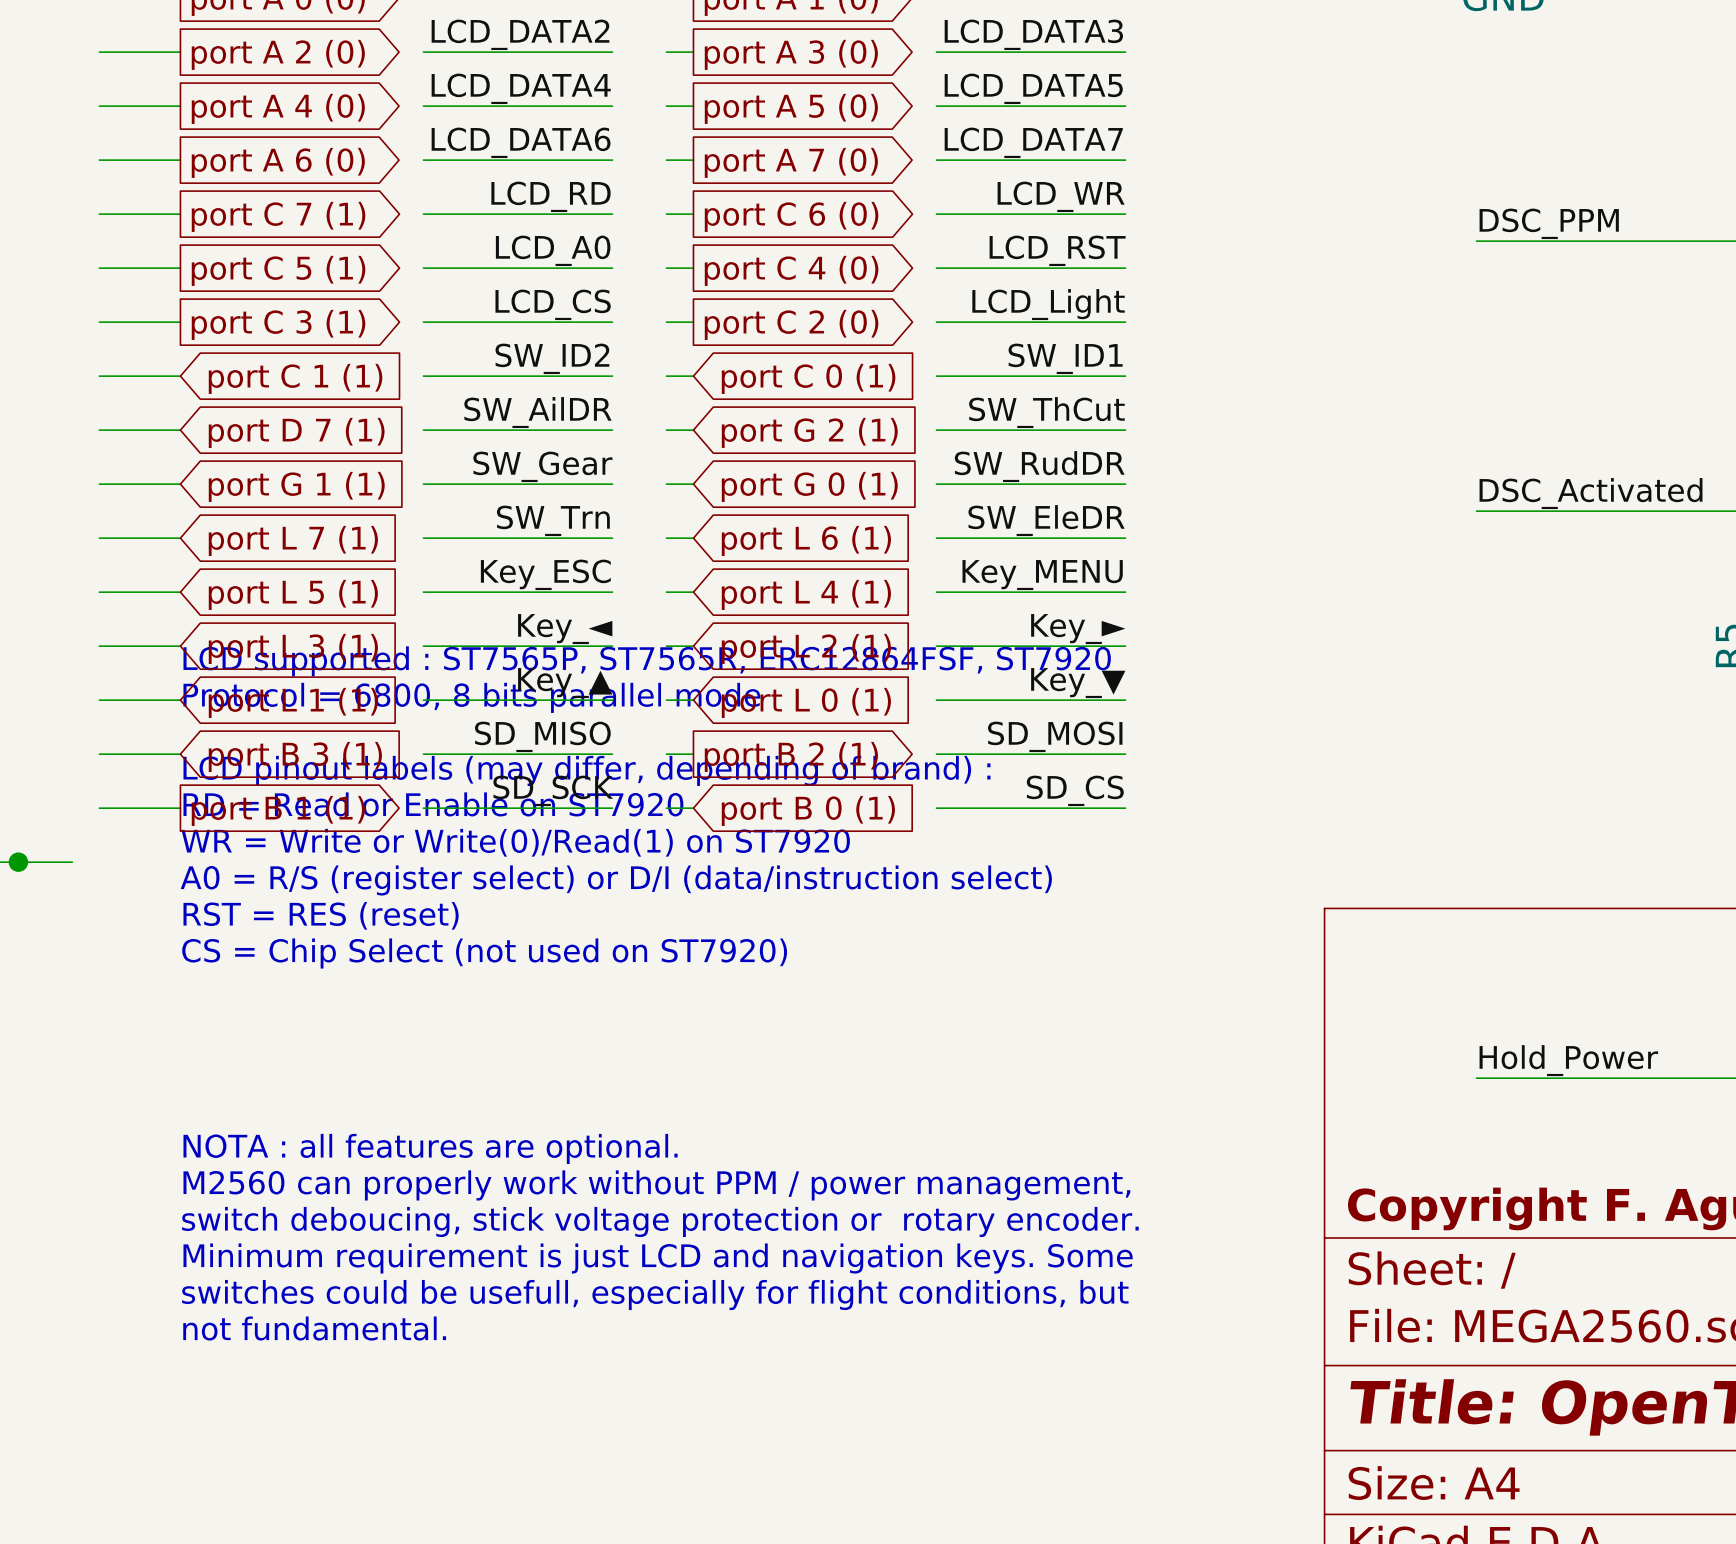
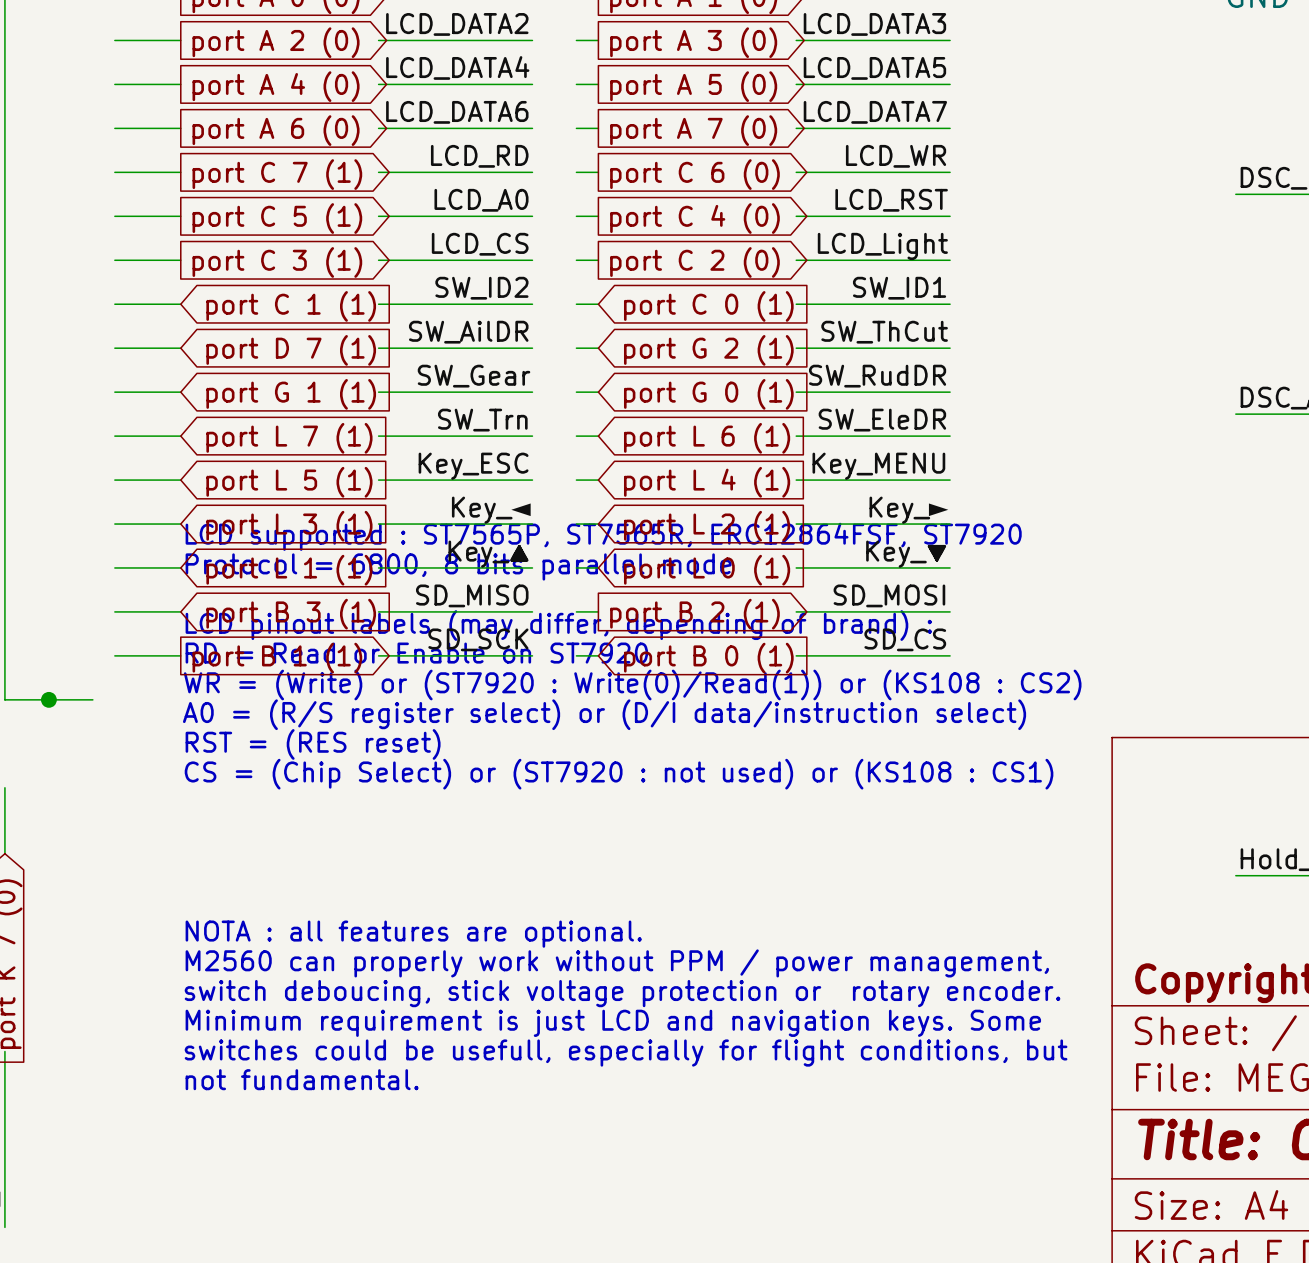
text: WR = Write or Write(0)/Read(1) on ST7920 (515, 842) -> WR = (Write) or (ST7920 : Write(0)/Read(1)) or (KS108 : CS2) (632, 684)
text: A0 = R/S (register select) or D/I (data/instruction select) (616, 880) -> A0 = (R/S register select) or (D/I data/instruction select) (604, 714)
text: RST = RES (reset) (321, 915) -> RST = (RES reset) (313, 744)
text: CS = Chip Select (not used on ST7920) (484, 953) -> CS = (Chip Select) or (ST7920 : not used) or (KS108 : CS1) (619, 774)

